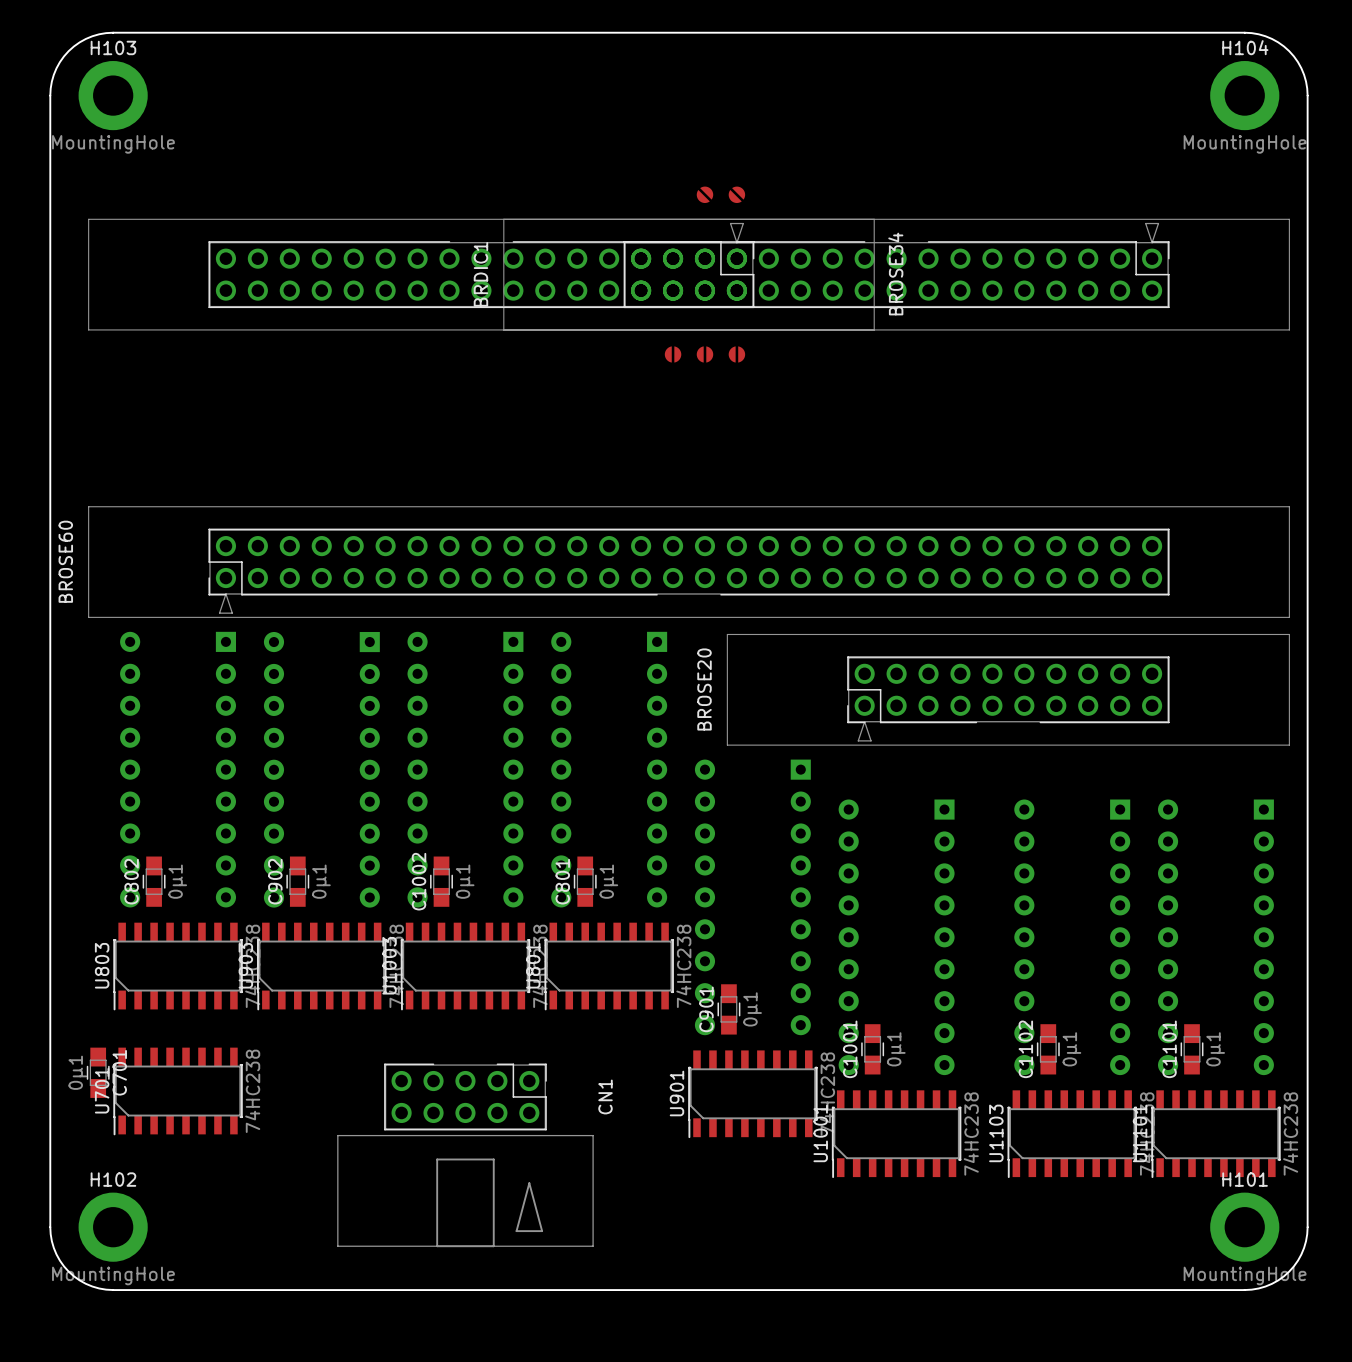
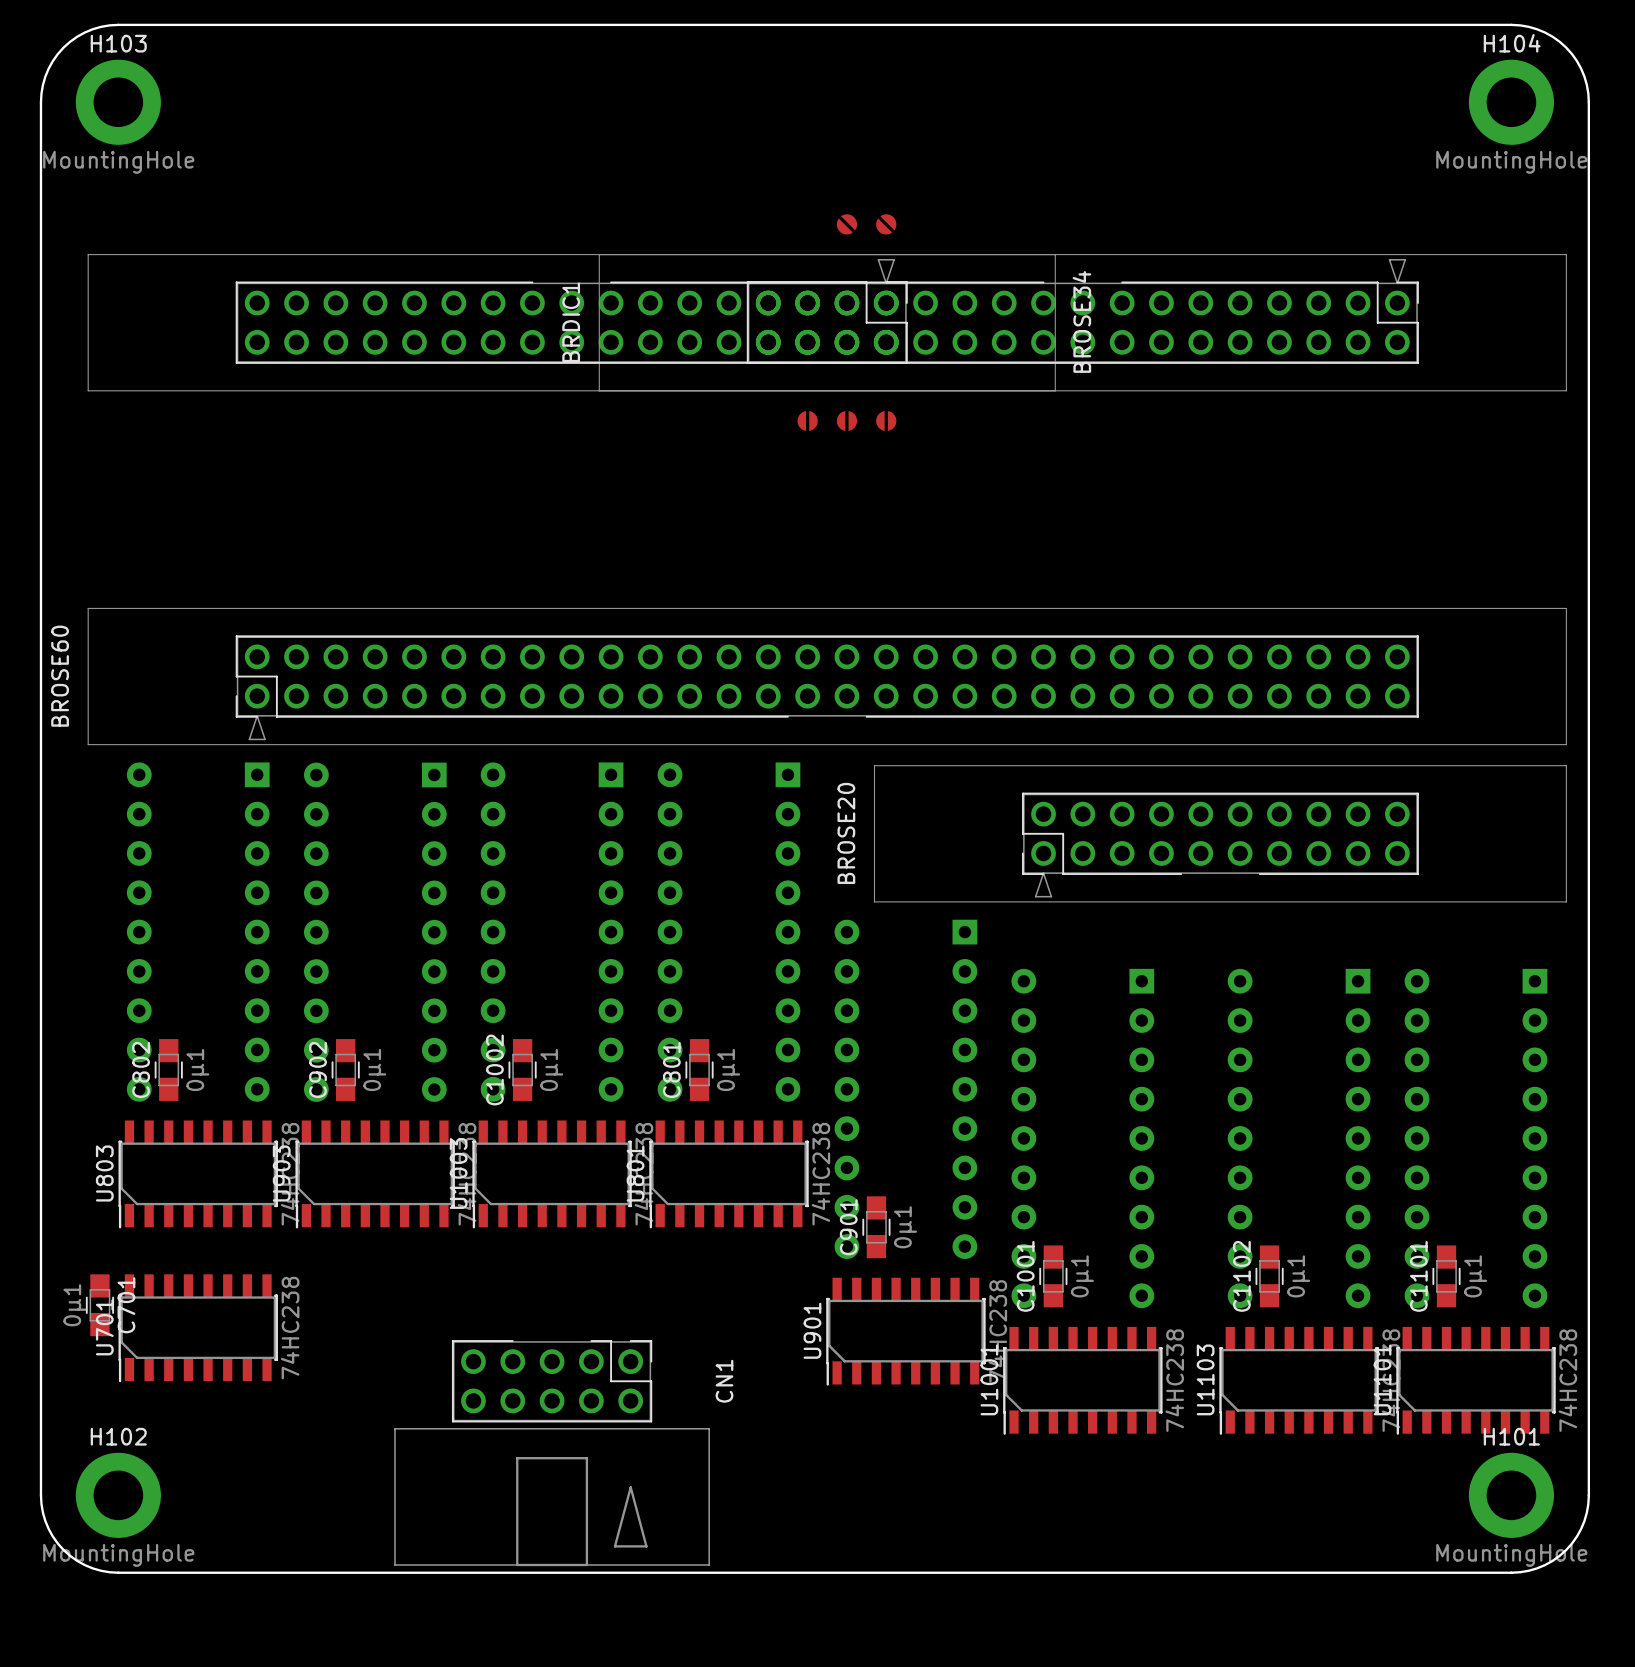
CN1 position: (465, 1155) -> (552, 1453)

